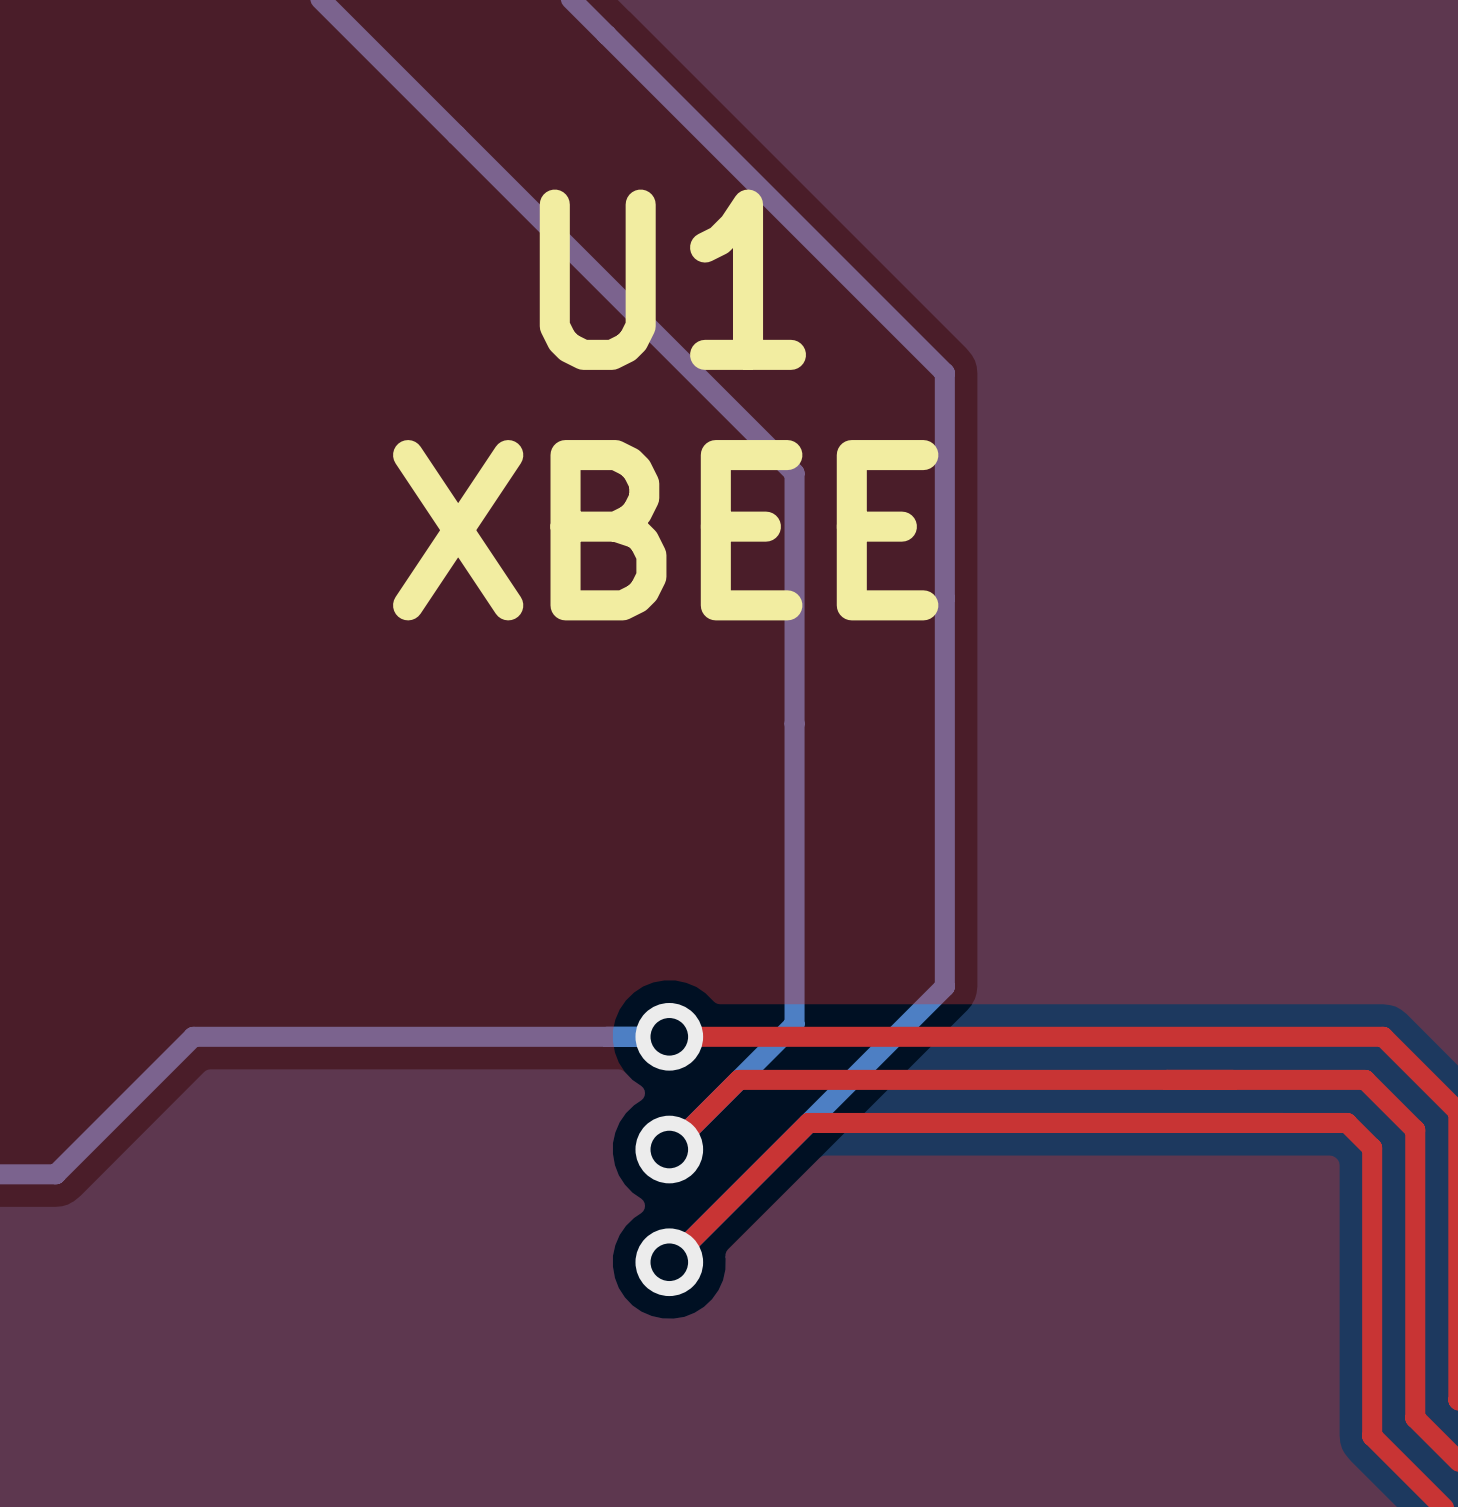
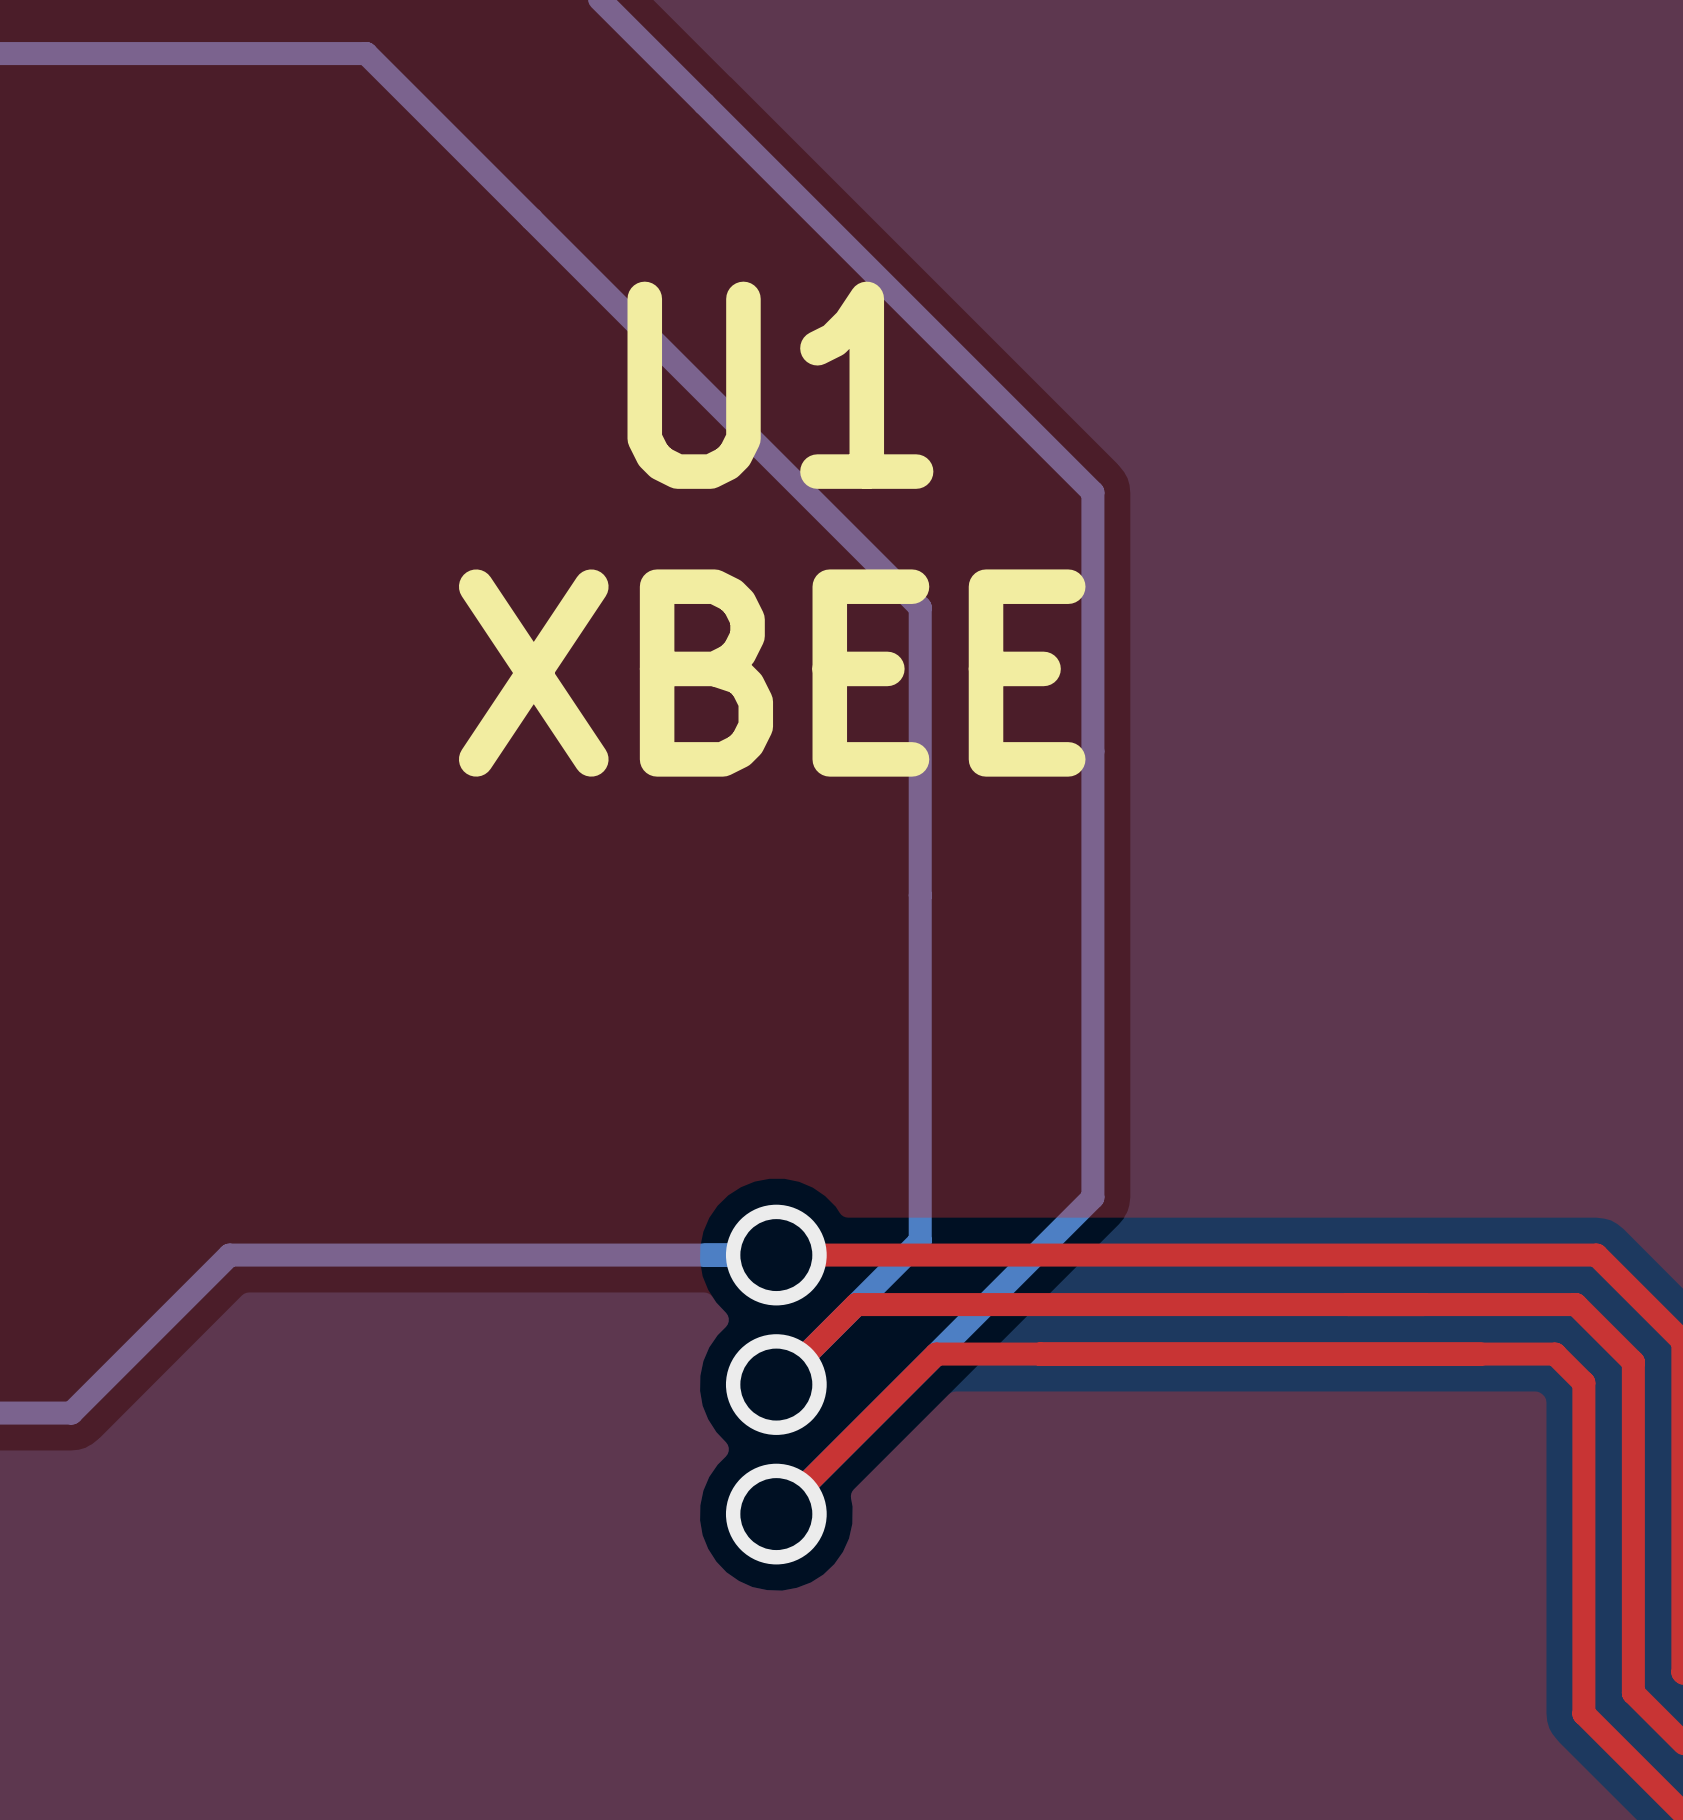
via size: [635, 1002, 704, 1071] -> [725, 1204, 827, 1306]
via size: [635, 1115, 704, 1184] -> [725, 1334, 827, 1435]
via size: [635, 1228, 704, 1297] -> [725, 1463, 827, 1565]

